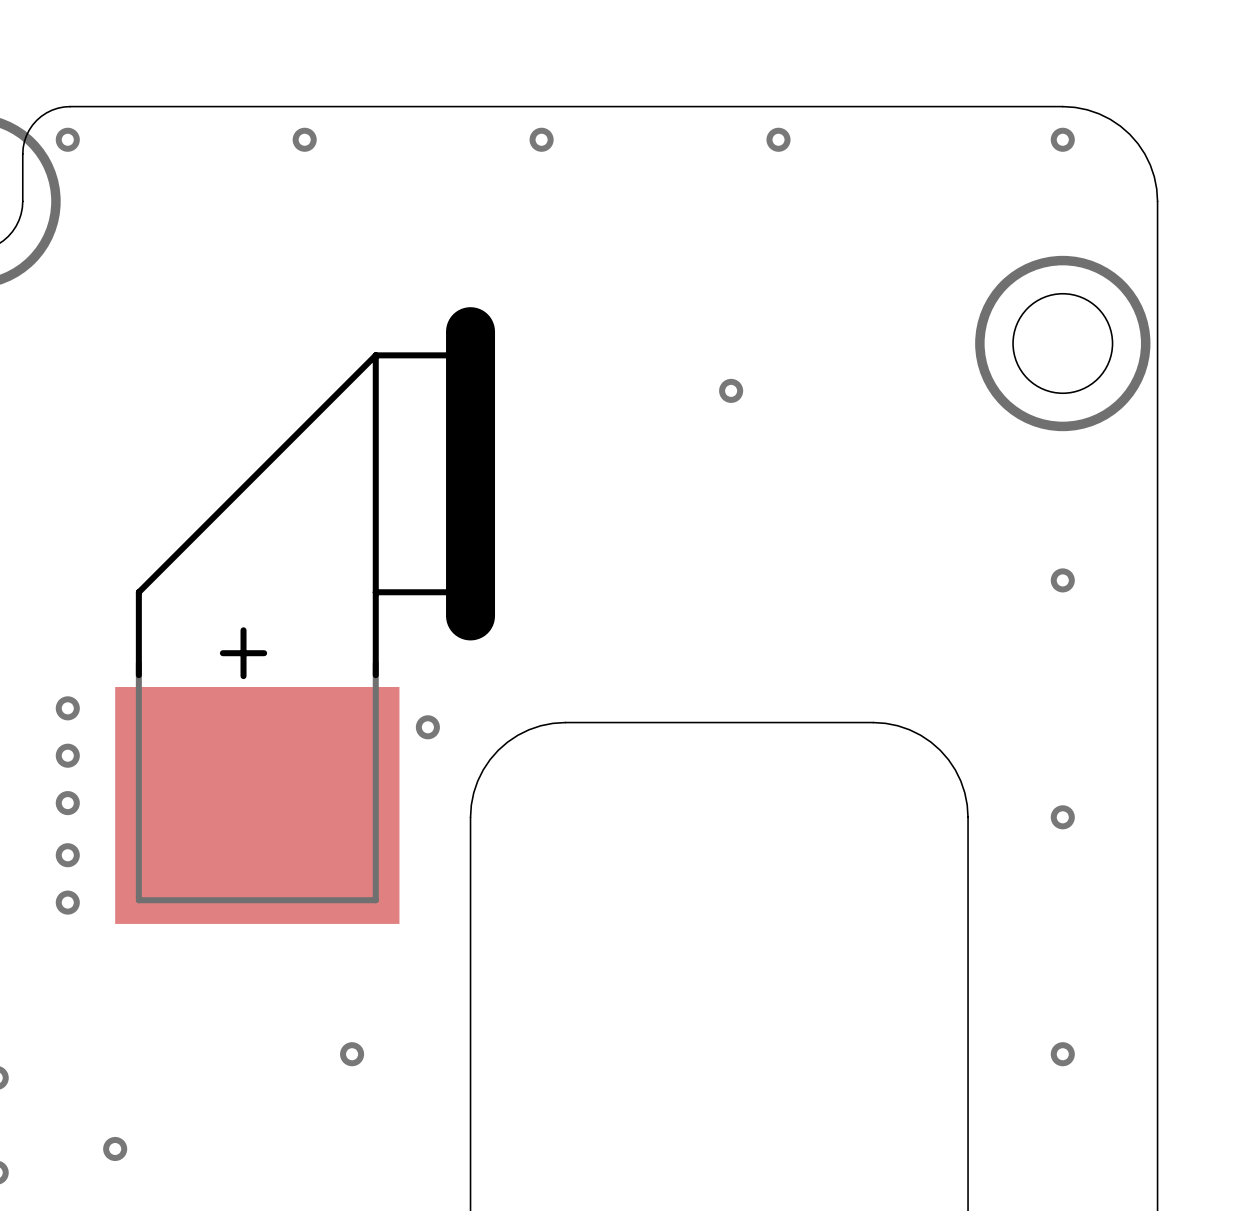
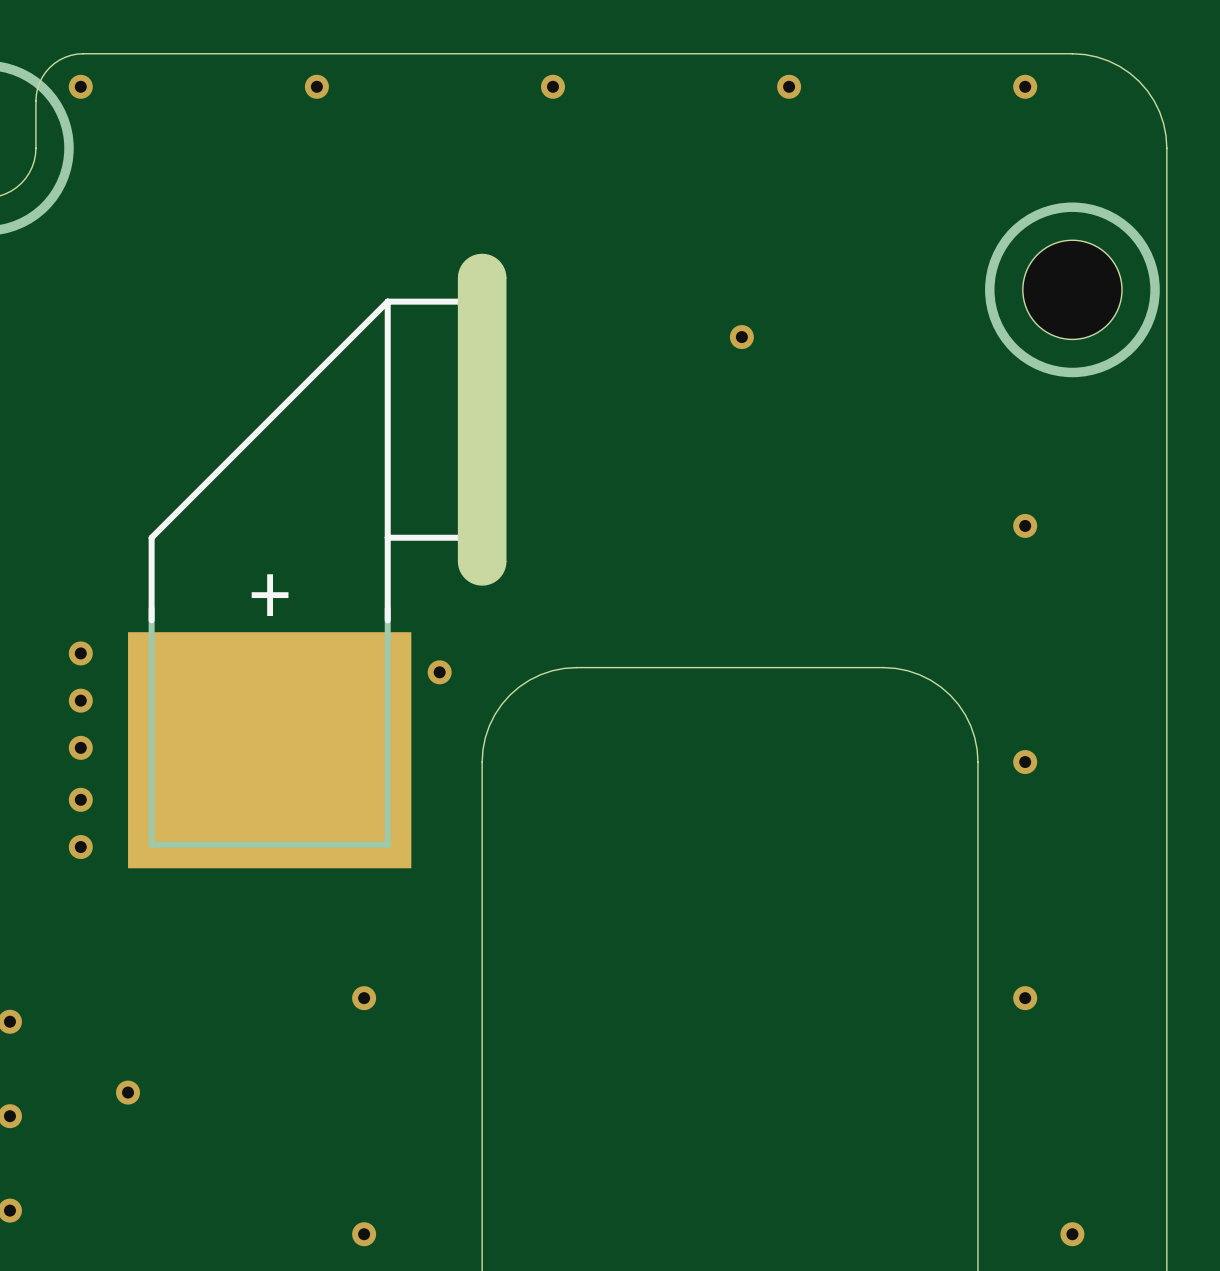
via position: (1062, 139) -> (1025, 86)
via position: (1062, 580) -> (1025, 525)
via position: (1062, 817) -> (1025, 762)
via position: (1062, 1054) -> (1025, 998)

